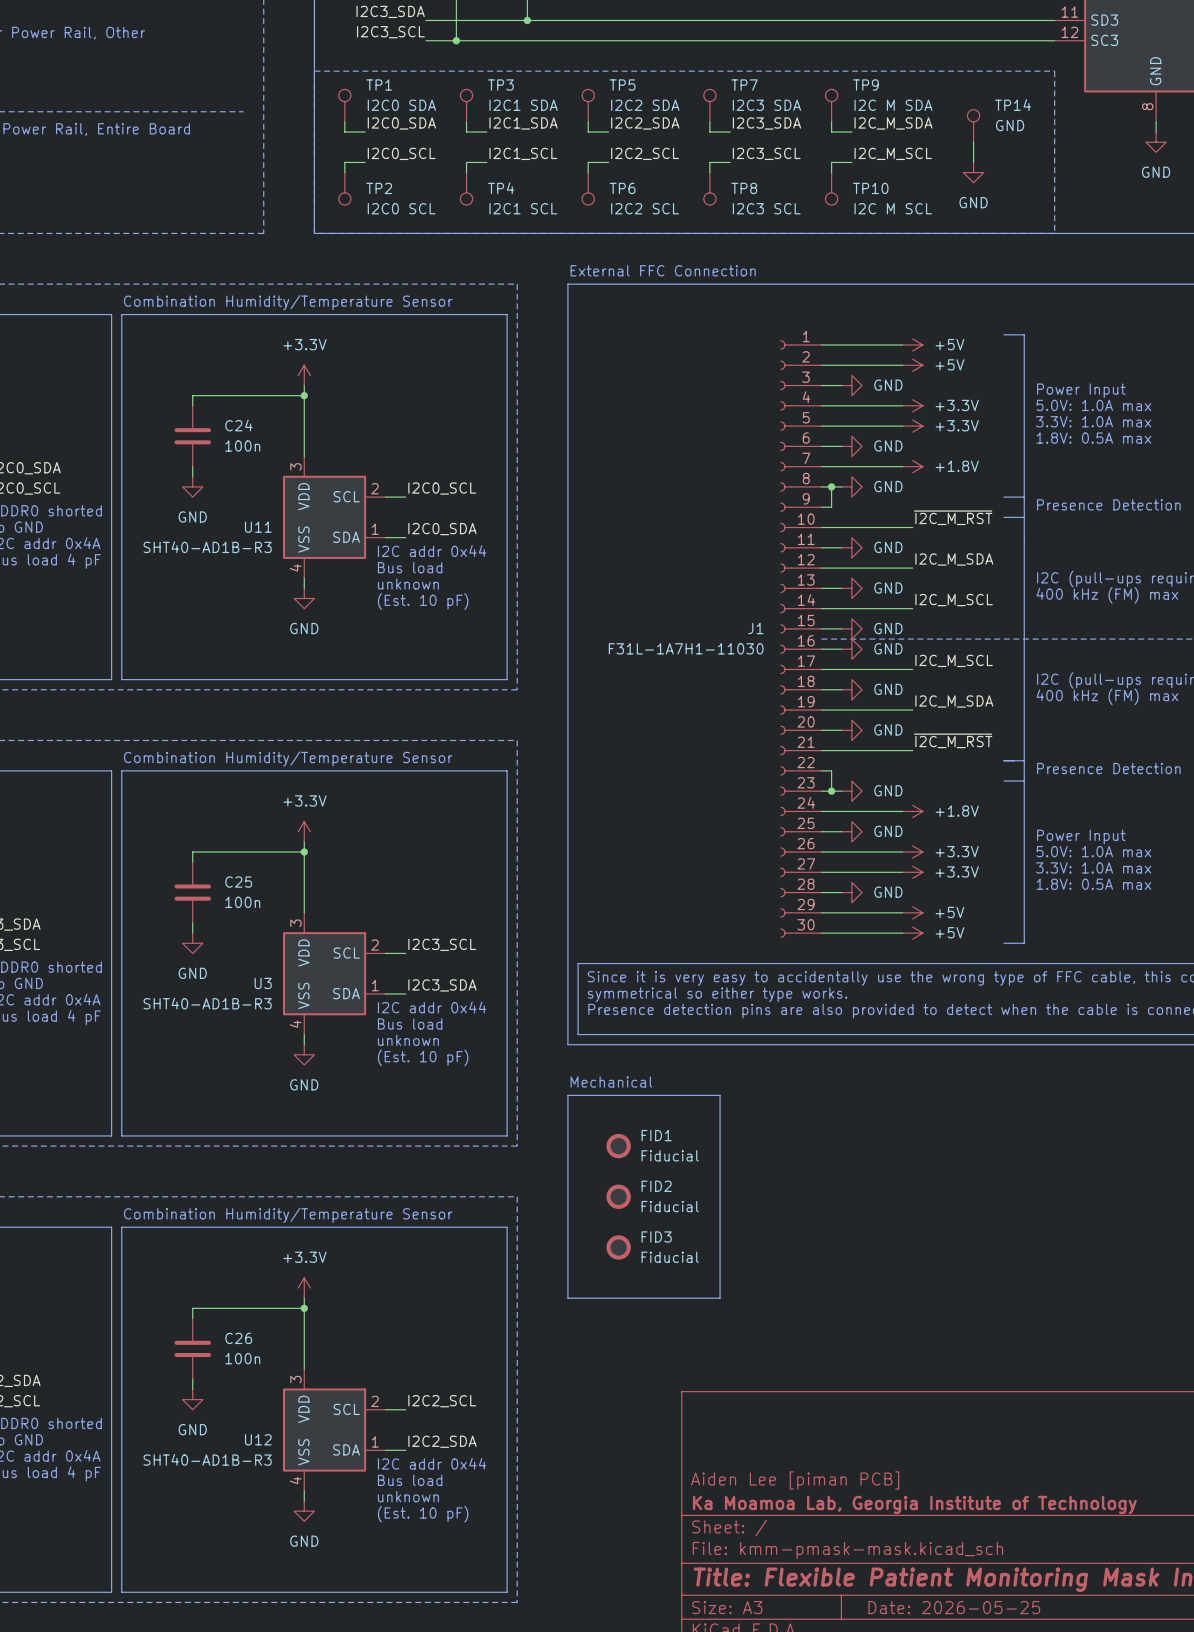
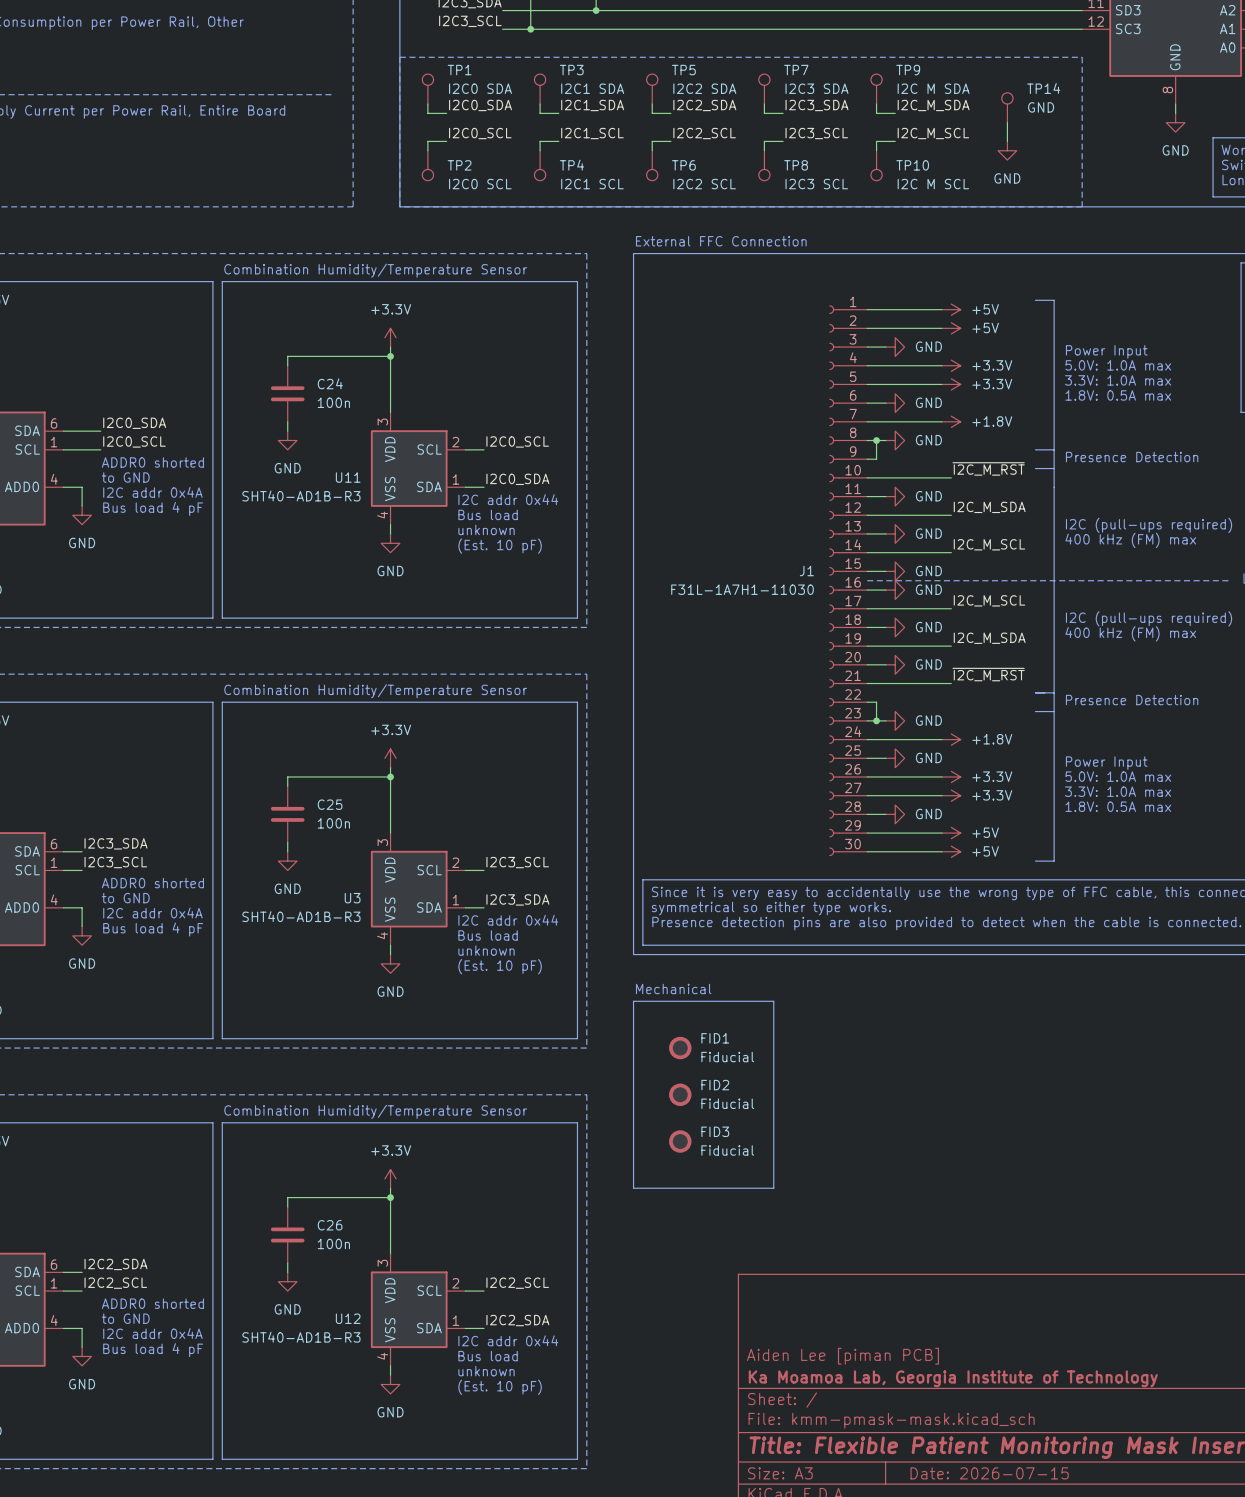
title block: Date: 2026-05-25 (954, 1607) -> Date: 2026-07-15 (989, 1473)

